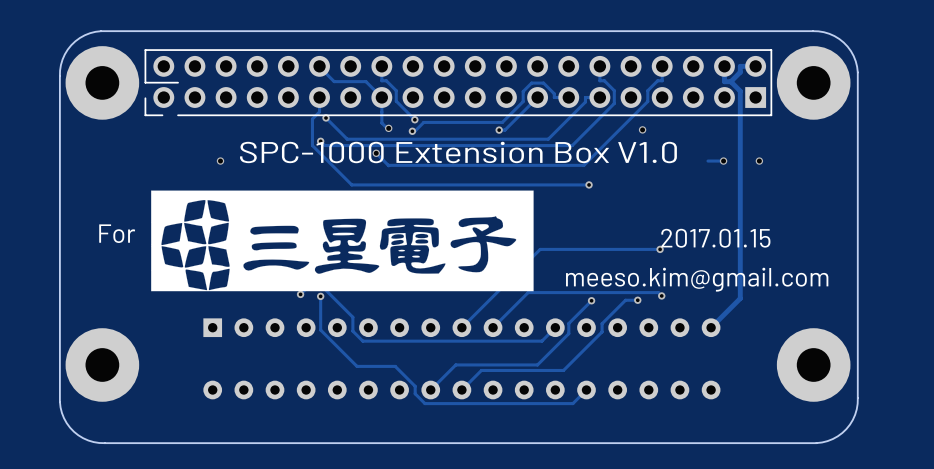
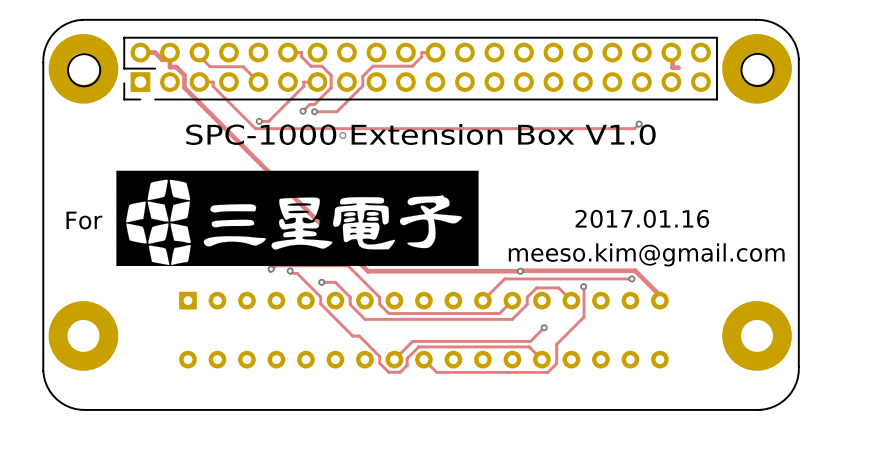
part footprint: [153, 55, 767, 108] -> [130, 42, 711, 92]
track: none -> (140, 52) (155, 52) (162, 59) (169, 59)
track: none -> (199, 52) (199, 56) (210, 66) (243, 66) (258, 82)
track: none -> (287, 52) (301, 52) (301, 56) (310, 66) (321, 66) (331, 75) (331, 87) (314, 104) (309, 104) (303, 111)
track: none -> (435, 52) (421, 52) (421, 56) (412, 66) (372, 66) (362, 76) (362, 85) (336, 111) (314, 111)
round board edge: none -> [67, 53, 102, 88]
track: (319, 66) (334, 81) (365, 81) (381, 97) (381, 123) (388, 128) -> none
track: (381, 66) (381, 80) (386, 80) (396, 90) (396, 101) (414, 119) -> none
track: (599, 66) (599, 80) (604, 80) (614, 90) (614, 103) (572, 145) (324, 145) (320, 141) -> none
track: (662, 66) (662, 80) (657, 80) (647, 90) (647, 101) (583, 165) (388, 165) (376, 153) -> none
track: (755, 66) (740, 66) (740, 72) (730, 81) (740, 91) (740, 298) (711, 327) -> (169, 52) (169, 67) (176, 67) (184, 75) (184, 87) (367, 271) (635, 270) (659, 295) (659, 300)
round board edge: none -> [740, 53, 775, 87]
track: none -> (199, 82) (213, 82) (213, 86) (255, 128) (634, 128) (639, 124)
track: none -> (317, 82) (303, 82) (303, 86) (268, 121) (259, 121)
track: (319, 97) (319, 111) (312, 119) (312, 145) (351, 184) (589, 184) -> none
track: (537, 97) (505, 130) (499, 130) -> none
track: (568, 97) (554, 97) (554, 93) (543, 83) (531, 83) (523, 91) (523, 101) (502, 122) (423, 122) (414, 131) (412, 131) -> none
track: (599, 97) (585, 97) (585, 102) (548, 139) (347, 139) (326, 117) -> none
via: (326, 117) -> none
via: (414, 119) -> none
via: none -> (303, 111)
via: none -> (314, 111)
via: (388, 128) -> none
via: (642, 129) -> none
via: (499, 130) -> none
via: (412, 131) -> none
via: none -> (259, 121)
via: (320, 141) -> none
via: none -> (639, 124)
via: (220, 161) -> none
track: (707, 161) (723, 161) -> none
via: (723, 161) -> none
via: (759, 161) -> none
via: (589, 184) -> none
text position: For (117, 233) -> For (84, 220)
text: 2017.01.15 (715, 238) -> 2017.01.16 (642, 218)
drawing position: (342, 240) -> (297, 218)
track: (660, 249) (540, 249) (461, 327) -> none
via: (660, 249) -> none
track: (300, 294) (306, 288) (323, 288) (352, 317) (352, 323) -> (290, 273) (297, 273) (320, 296)
track: (661, 295) (658, 292) (528, 292) (493, 327) -> none
via: (661, 295) -> none
track: (320, 296) (320, 330) (357, 366) (395, 366) (415, 386) -> (330, 313) (352, 336) (359, 336) (379, 356)
via: none -> (520, 271)
track: (591, 300) (568, 323) (568, 333) (537, 364) (455, 364) (449, 370) -> (544, 327) (530, 341) (412, 341)
via: (591, 300) -> none
track: (637, 300) (625, 300) (602, 323) (602, 331) (563, 370) (481, 370) (461, 390) -> (583, 286) (584, 317) (556, 344) (556, 363) (547, 372) (436, 372) (423, 359)
via position: (637, 300) -> (583, 286)
track: none -> (631, 278) (504, 278) (482, 300)
via: none -> (631, 278)
track: none -> (321, 282) (335, 282) (350, 297) (350, 304) (364, 319) (512, 319) (527, 304) (527, 297) (536, 287) (558, 287) (571, 300)
via: none -> (321, 282)
track: (362, 341) (541, 341) -> (270, 271) (276, 265) (348, 265) (379, 297) (379, 304) (388, 313) (499, 313)
via: none -> (544, 327)
track: (586, 390) (572, 403) (424, 403) -> (541, 359) (529, 346) (418, 346) (407, 358) (407, 365) (400, 372) (388, 372)

